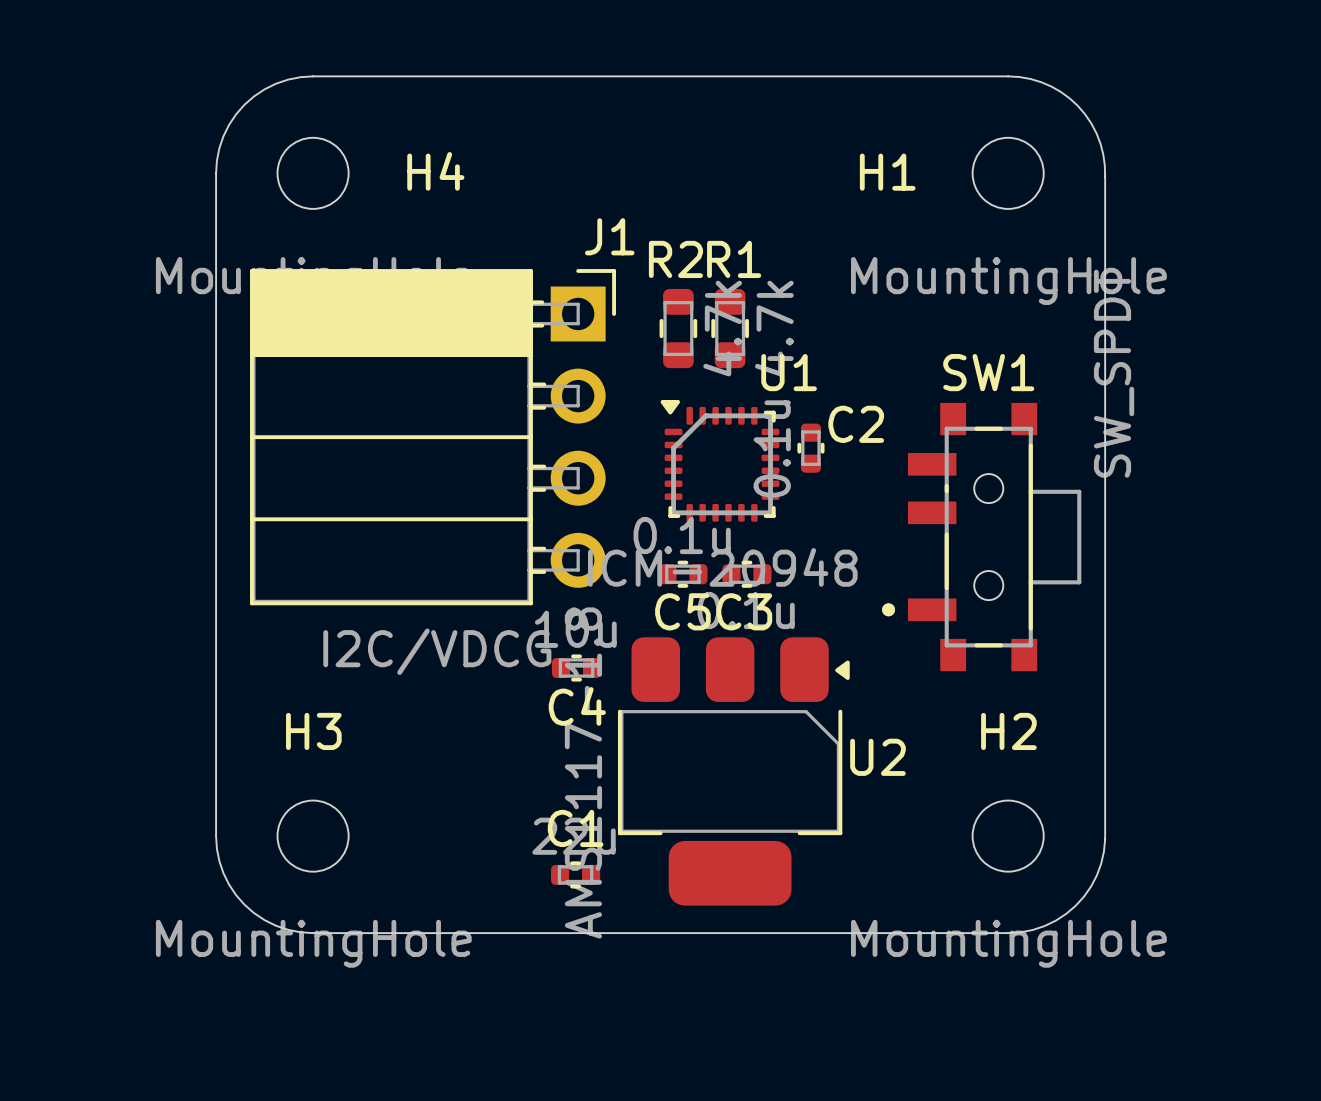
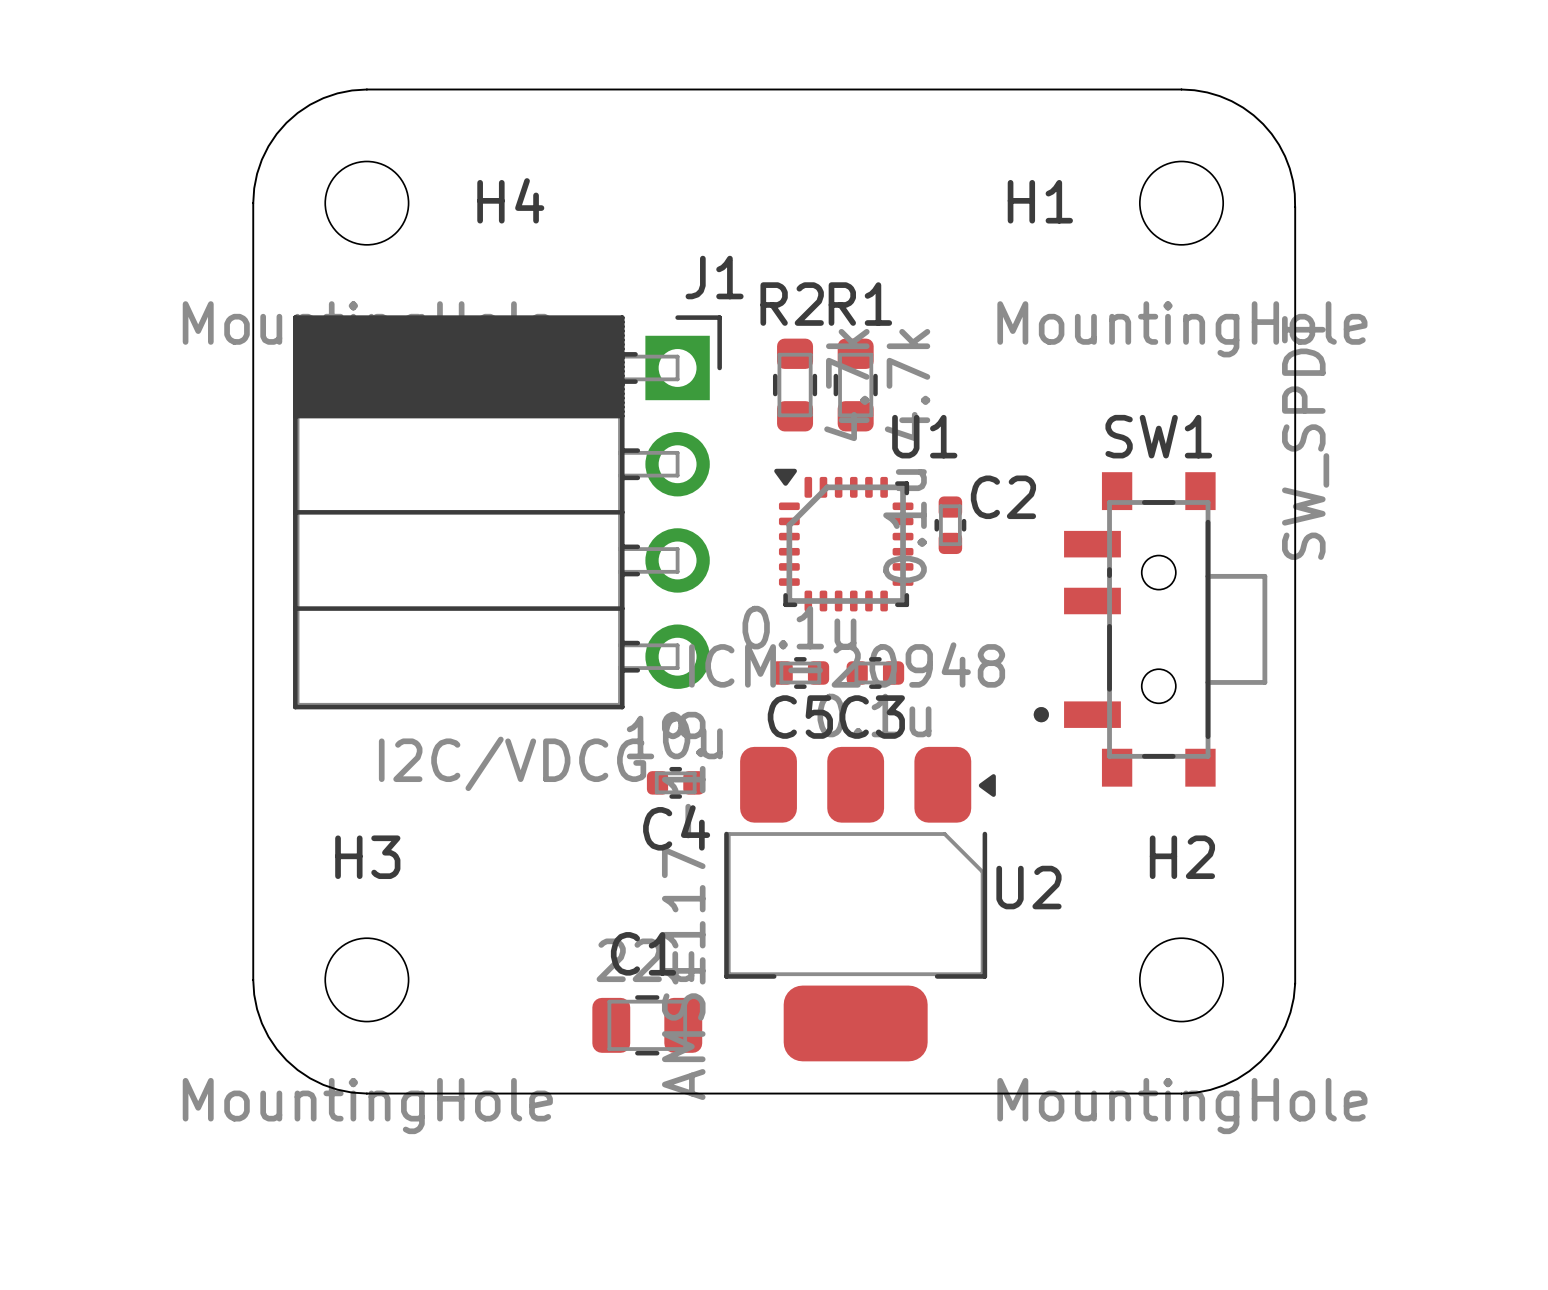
C1 footprint: [551, 861, 601, 889] -> [592, 995, 703, 1056]

